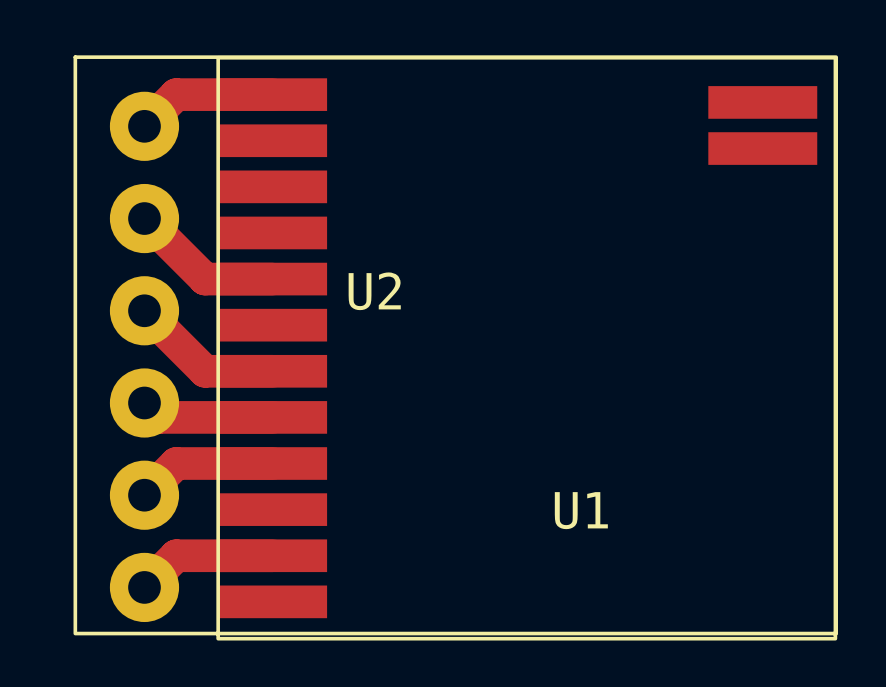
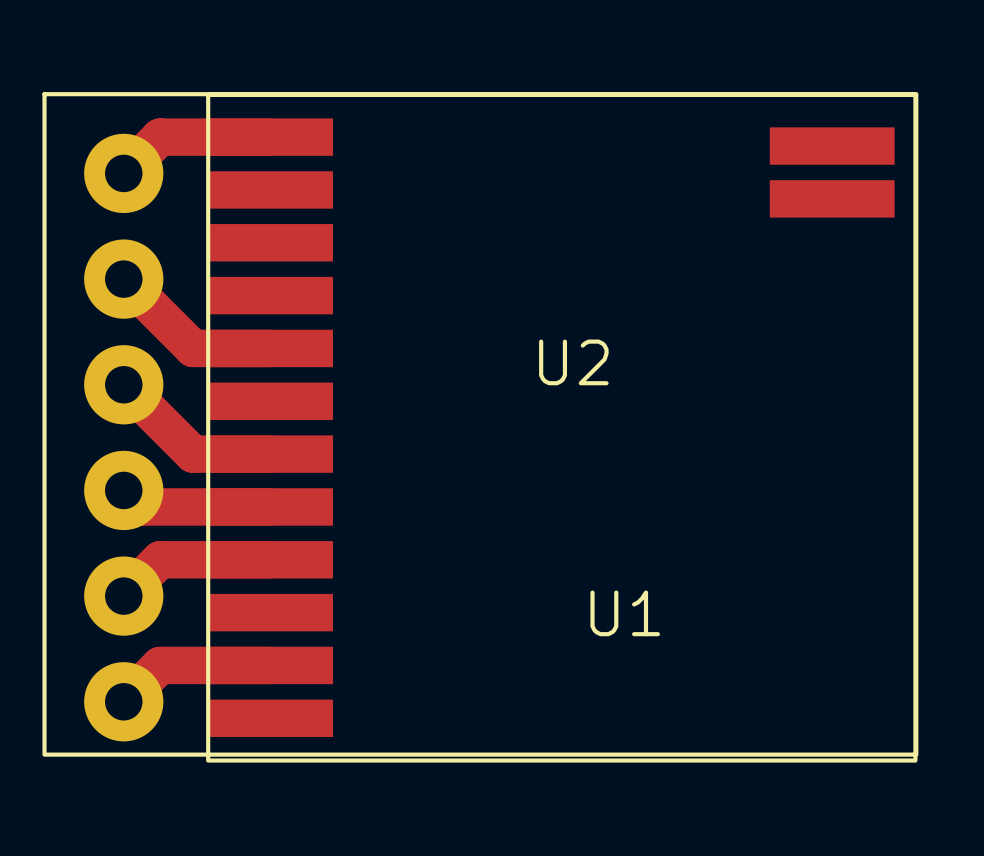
U2 name position: U2 (374, 291) -> U2 (573, 362)

